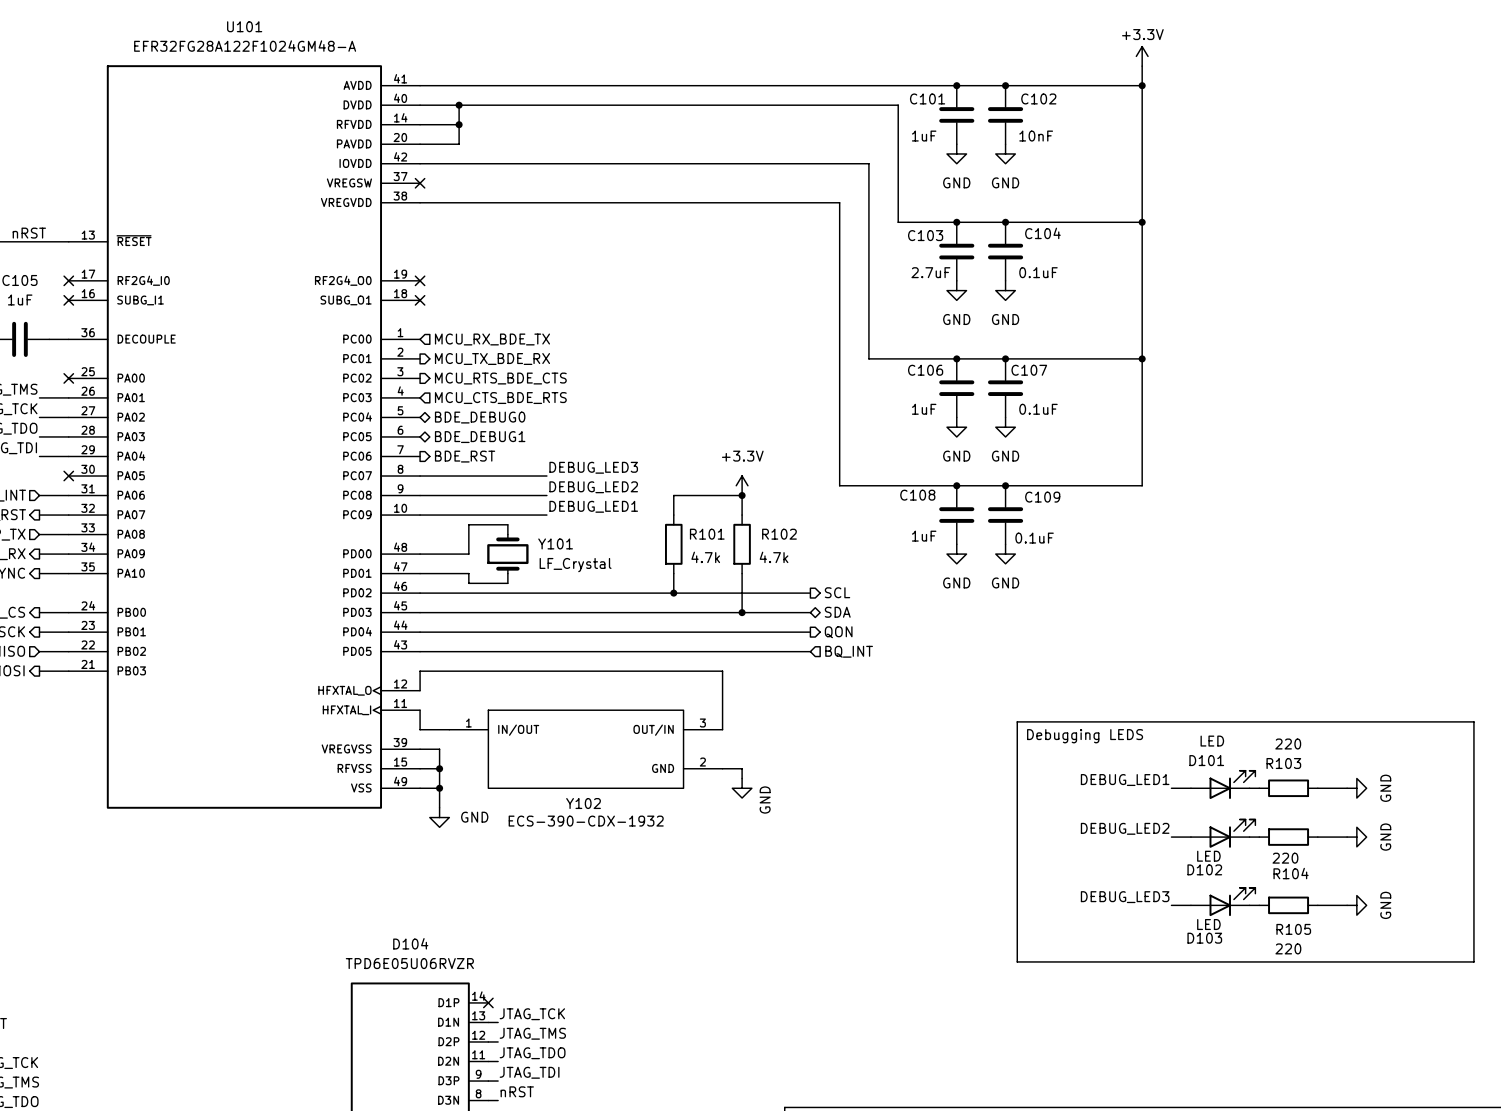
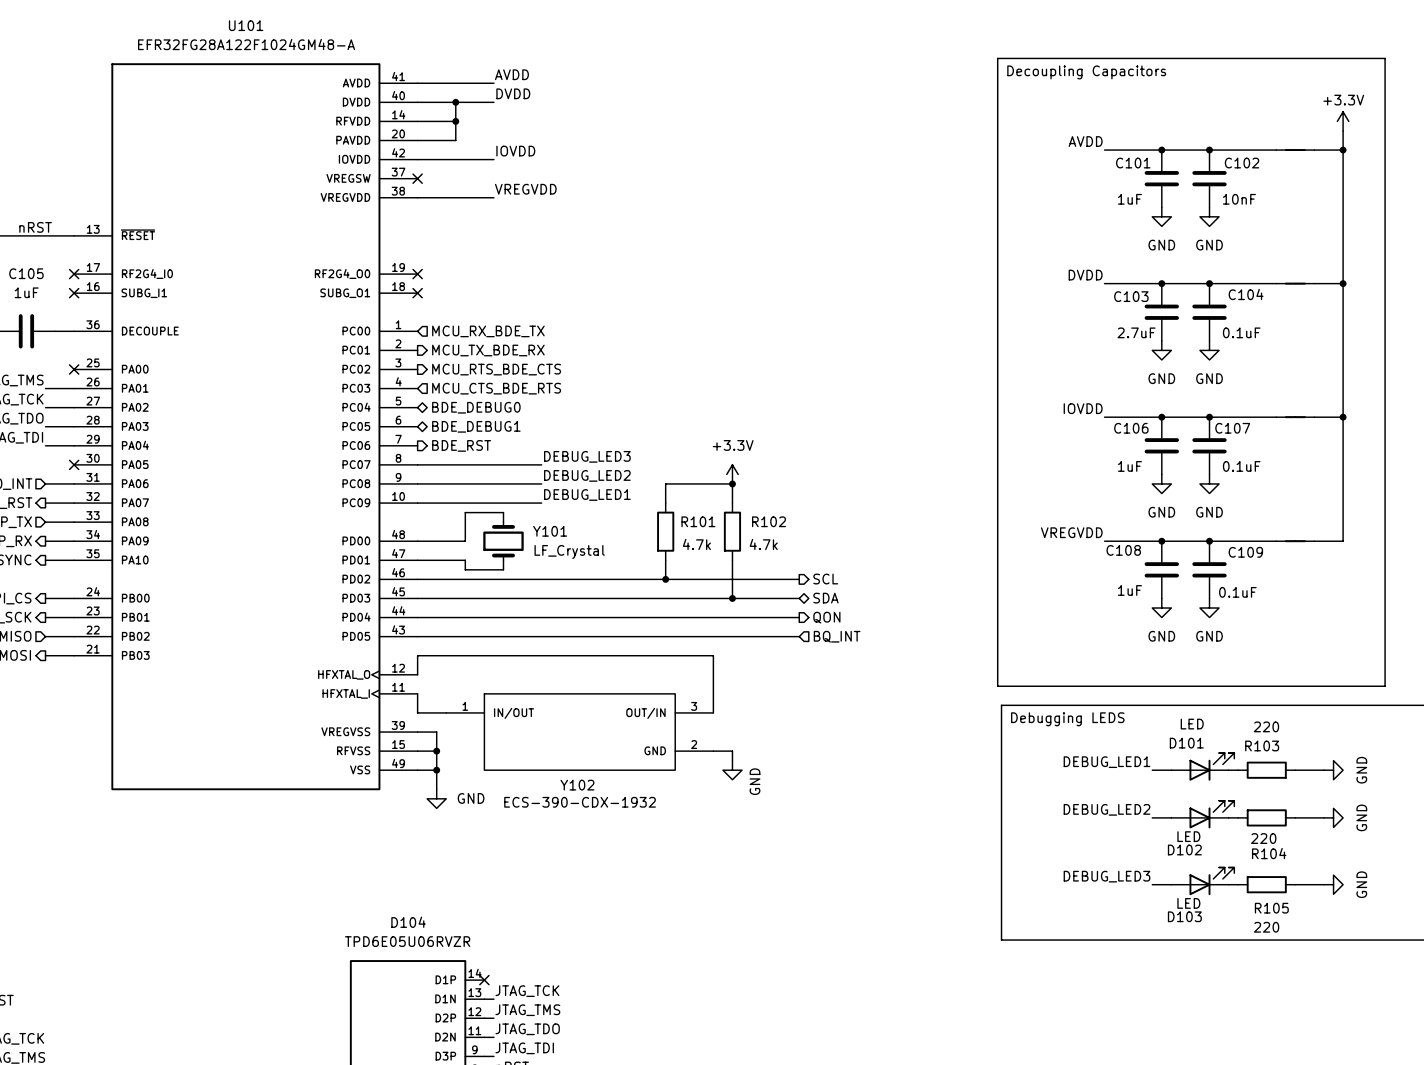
power symbol: +3.3V (1142, 56) -> none
line: none -> (997, 58) (1385, 58) (1385, 686) (997, 686) (997, 58)
wire: (1142, 66) (1142, 485) (839, 485) (839, 202) (498, 202) -> none
text: none -> Decoupling Capacitors (1086, 72)
label: none -> AVDD (511, 74)
wire: (498, 85) (1142, 85) -> none
junction: (956, 85) -> none
junction: (1005, 85) -> none
junction: (1142, 85) -> none
label: none -> DVDD (513, 93)
wire: (498, 105) (898, 105) (898, 222) (1142, 222) -> none
C101 position: (956, 114) -> (1161, 178)
C102 position: (1005, 114) -> (1209, 178)
power symbol: none -> +3.3V (1343, 121)
wire: none -> (1343, 130) (1343, 541) (1314, 541)
label: none -> AVDD (1085, 141)
power symbol: GND (956, 153) -> none
power symbol: GND (1005, 153) -> none
wire: none -> (1104, 150) (1276, 150)
junction: none -> (1161, 150)
junction: none -> (1209, 150)
part: none -> (1295, 150)
wire: none -> (1314, 150) (1343, 150)
junction: none -> (1343, 150)
label: none -> IOVDD (515, 151)
wire: (498, 163) (868, 163) (868, 358) (1142, 358) -> none
label: none -> VREGVDD (525, 189)
junction: (956, 222) -> none
junction: (1005, 222) -> none
junction: (1142, 222) -> none
power symbol: none -> GND (1161, 216)
power symbol: none -> GND (1209, 216)
C103 position: (956, 251) -> (1161, 312)
C104 position: (1005, 251) -> (1209, 312)
label: none -> DVDD (1085, 275)
power symbol: GND (956, 290) -> none
power symbol: GND (1005, 290) -> none
wire: none -> (1104, 283) (1276, 283)
junction: none -> (1161, 283)
junction: none -> (1209, 283)
part: none -> (1295, 283)
wire: none -> (1314, 283) (1343, 283)
junction: none -> (1343, 283)
junction: (956, 358) -> none
junction: (1005, 358) -> none
junction: (1142, 358) -> none
power symbol: none -> GND (1161, 350)
power symbol: none -> GND (1209, 350)
C106 position: (956, 388) -> (1161, 445)
C107 position: (1005, 388) -> (1209, 445)
label: none -> IOVDD (1083, 408)
power symbol: GND (956, 427) -> none
power symbol: GND (1005, 427) -> none
wire: none -> (1104, 417) (1276, 417)
junction: none -> (1161, 417)
junction: none -> (1209, 417)
part: none -> (1295, 417)
wire: none -> (1314, 417) (1343, 417)
junction: none -> (1343, 417)
junction: (956, 485) -> none
junction: (1005, 485) -> none
power symbol: none -> GND (1161, 483)
power symbol: none -> GND (1209, 483)
C108 position: (956, 515) -> (1161, 569)
C109 position: (1005, 515) -> (1209, 569)
label: none -> VREGVDD (1071, 532)
power symbol: GND (956, 554) -> none
power symbol: GND (1005, 554) -> none
wire: none -> (1104, 541) (1276, 541)
junction: none -> (1161, 541)
junction: none -> (1209, 541)
part: none -> (1295, 541)
power symbol: none -> GND (1161, 608)
power symbol: none -> GND (1209, 608)

